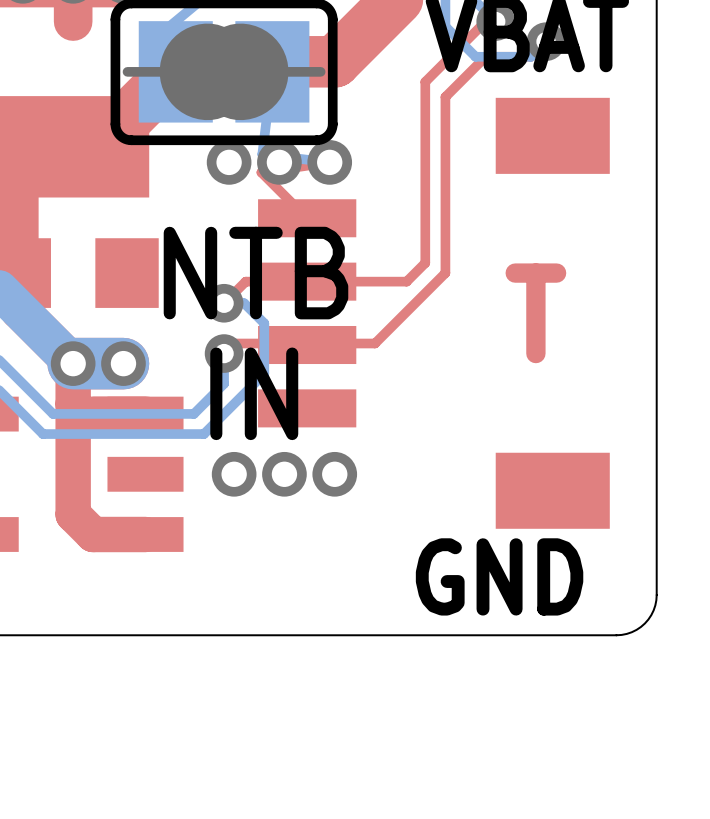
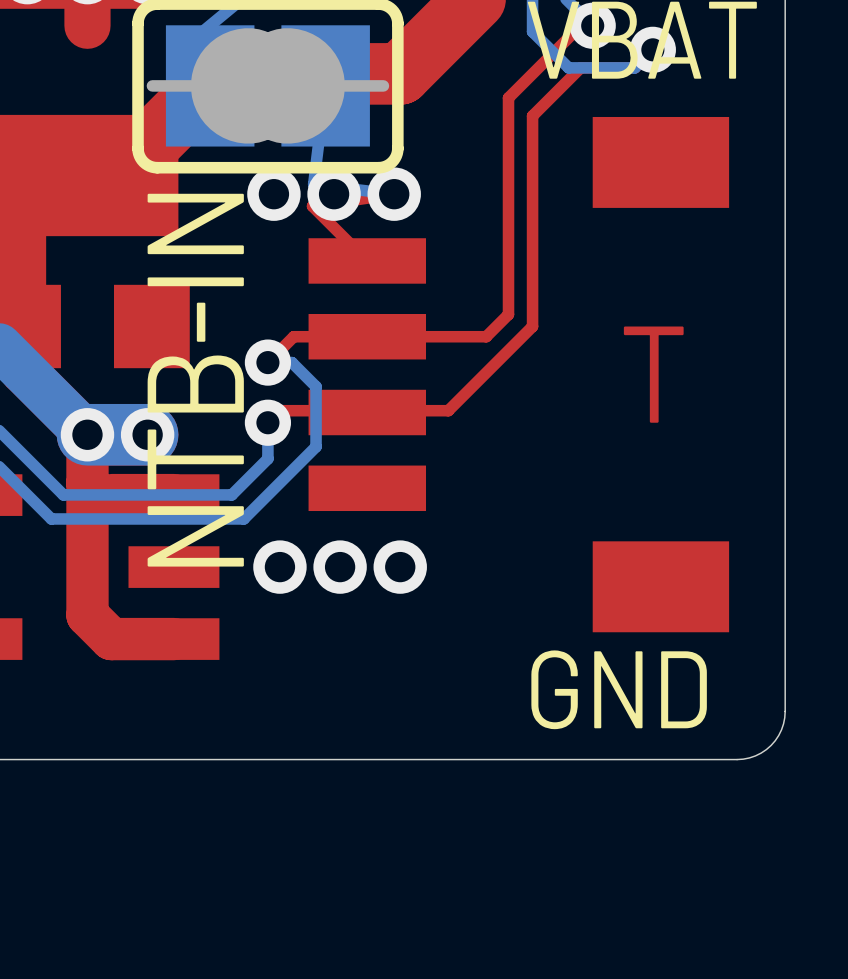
text: NTB (255, 273) -> NTB-IN (195, 380)
text: IN (254, 393) -> none

